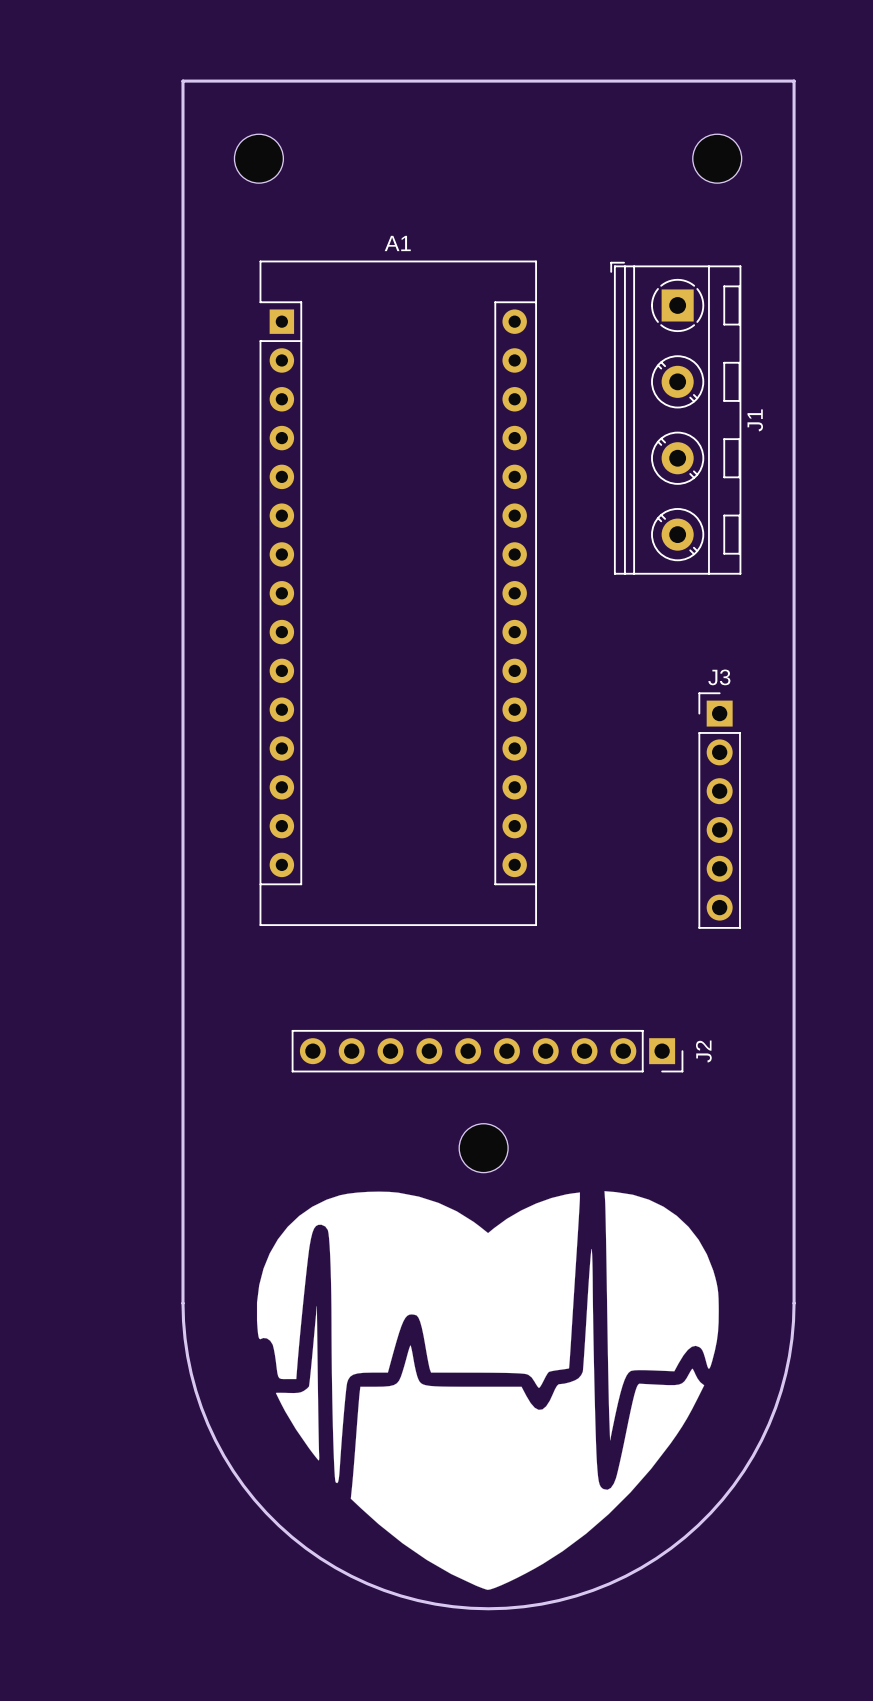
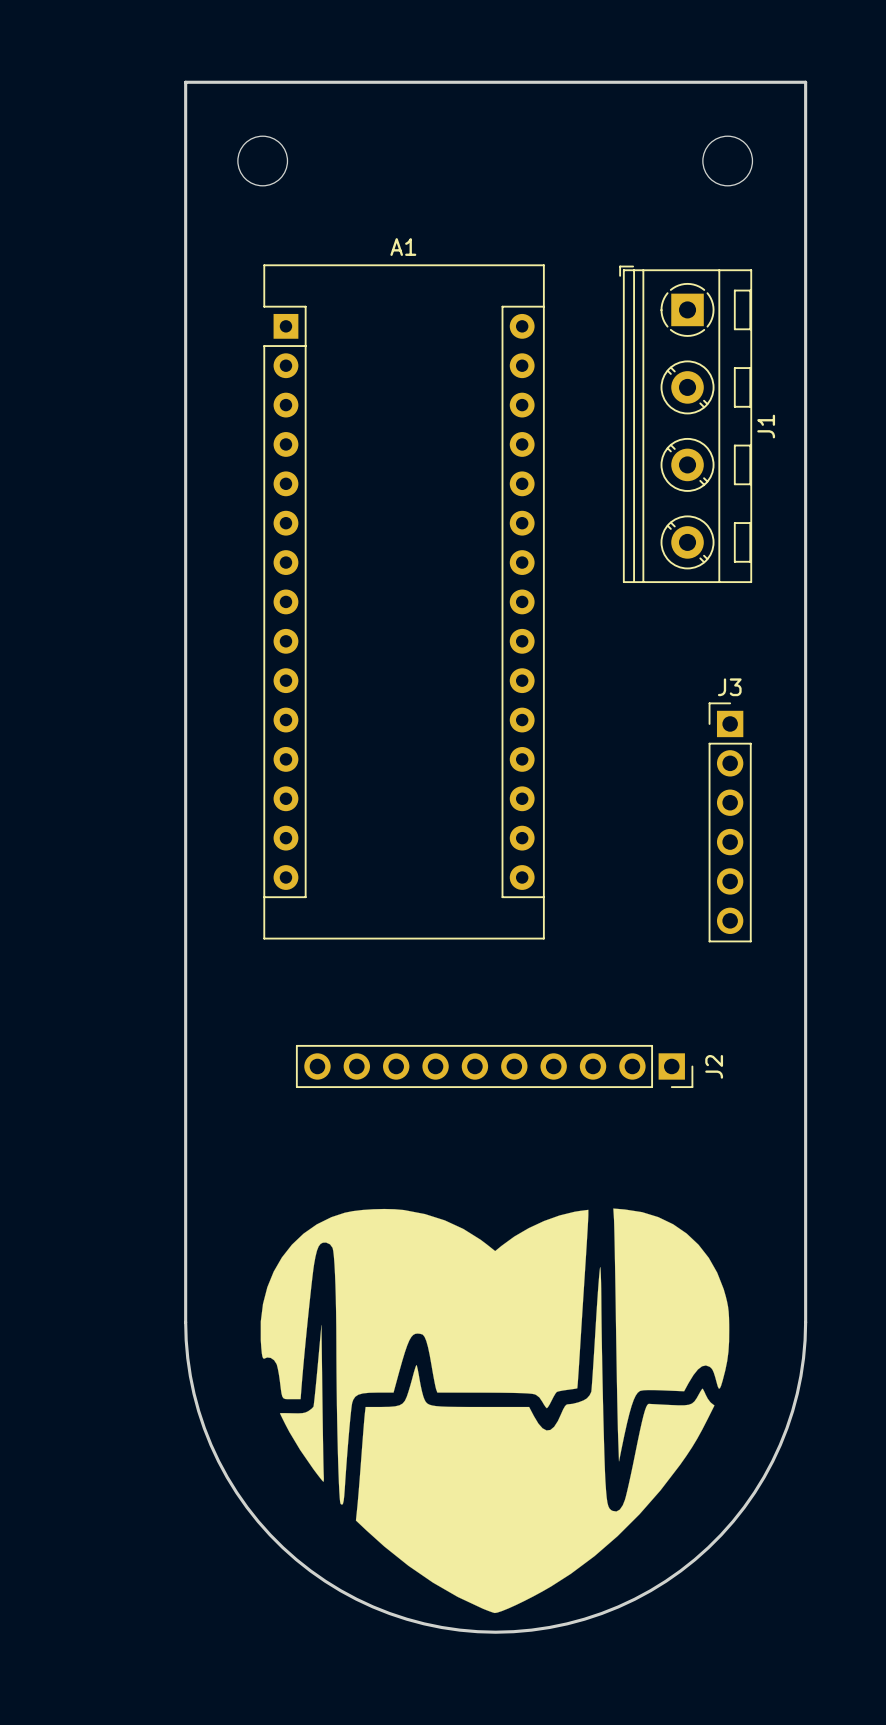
part: (483, 1148) -> none

